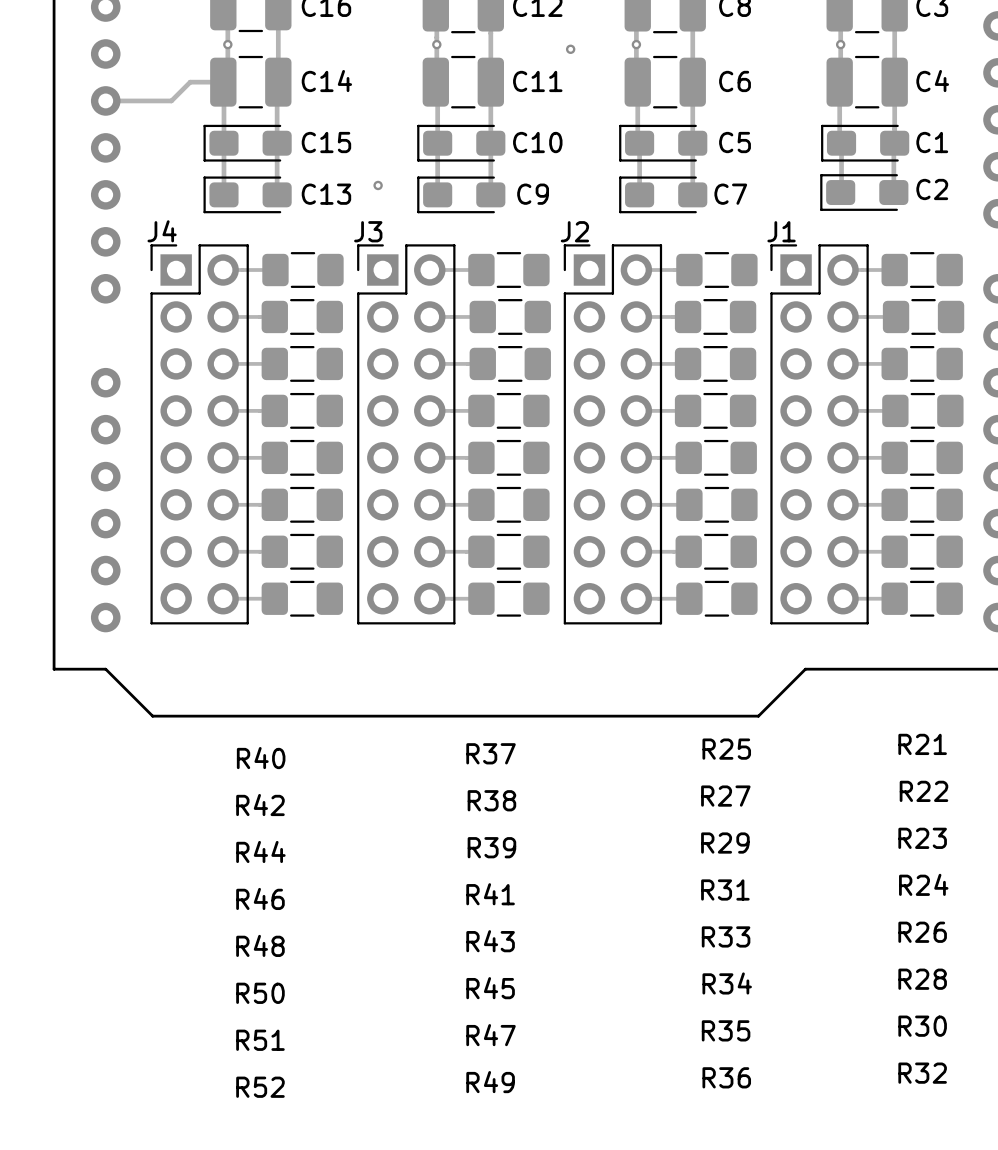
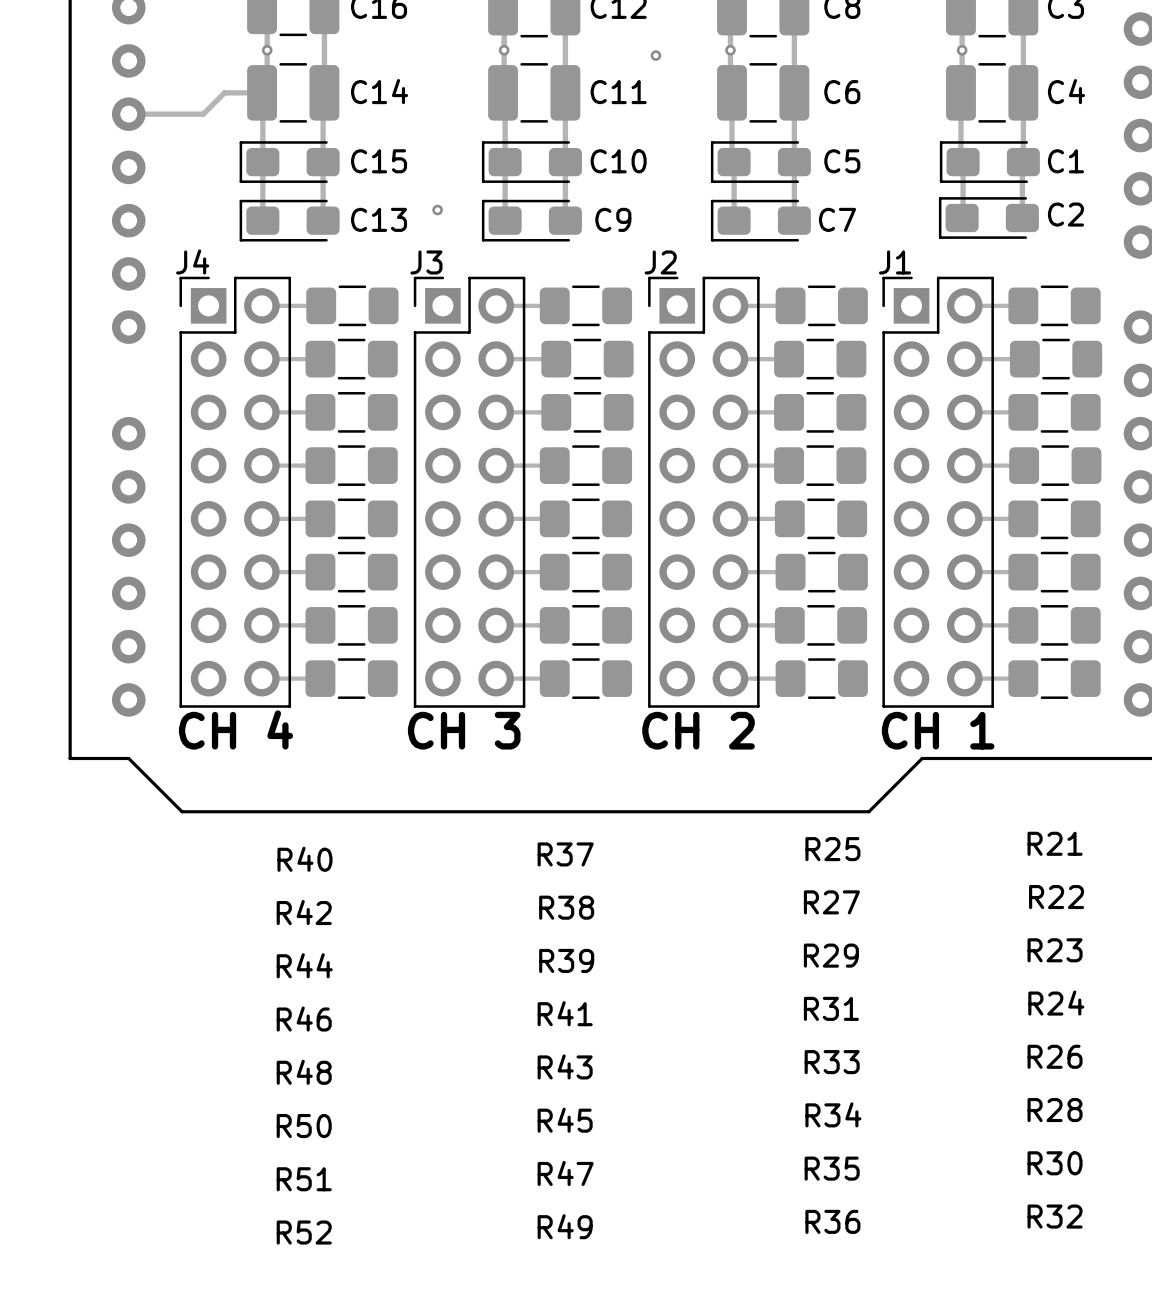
text: none -> CH 4 (235, 729)
text: none -> CH 3 (464, 730)
text: none -> CH 2 (698, 730)
text: none -> CH 1 (938, 730)

